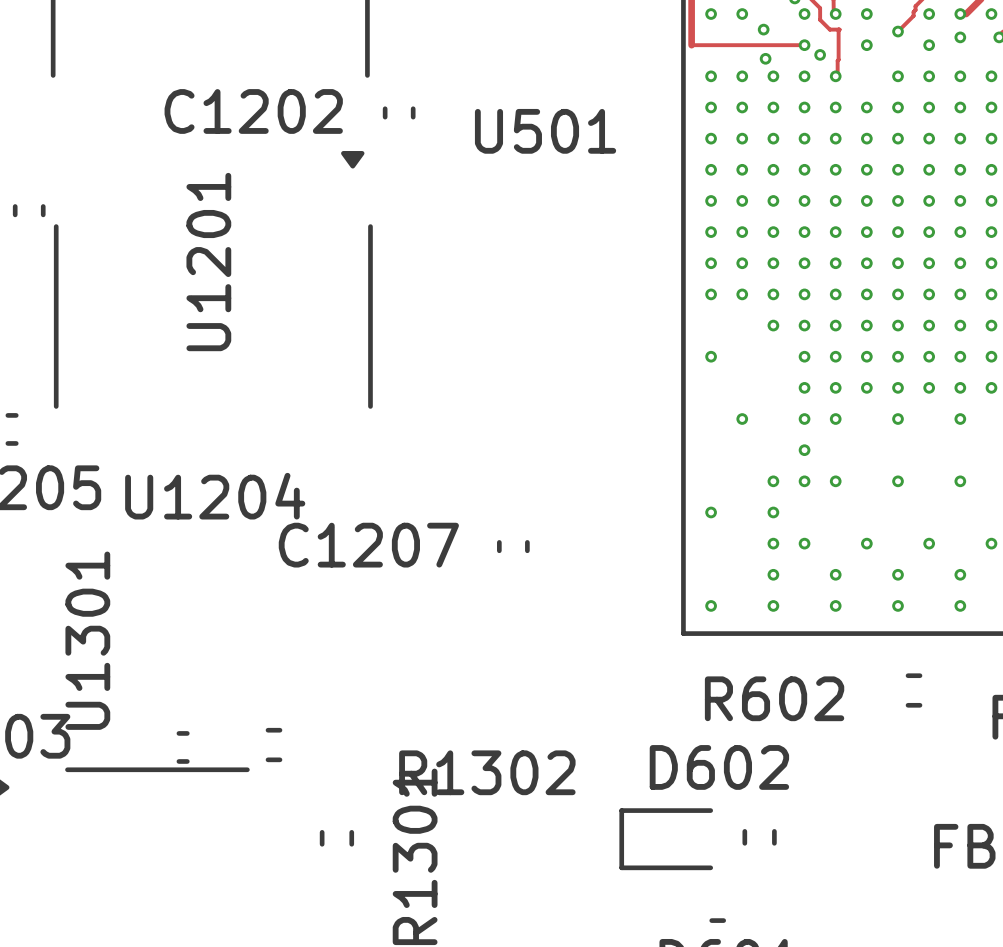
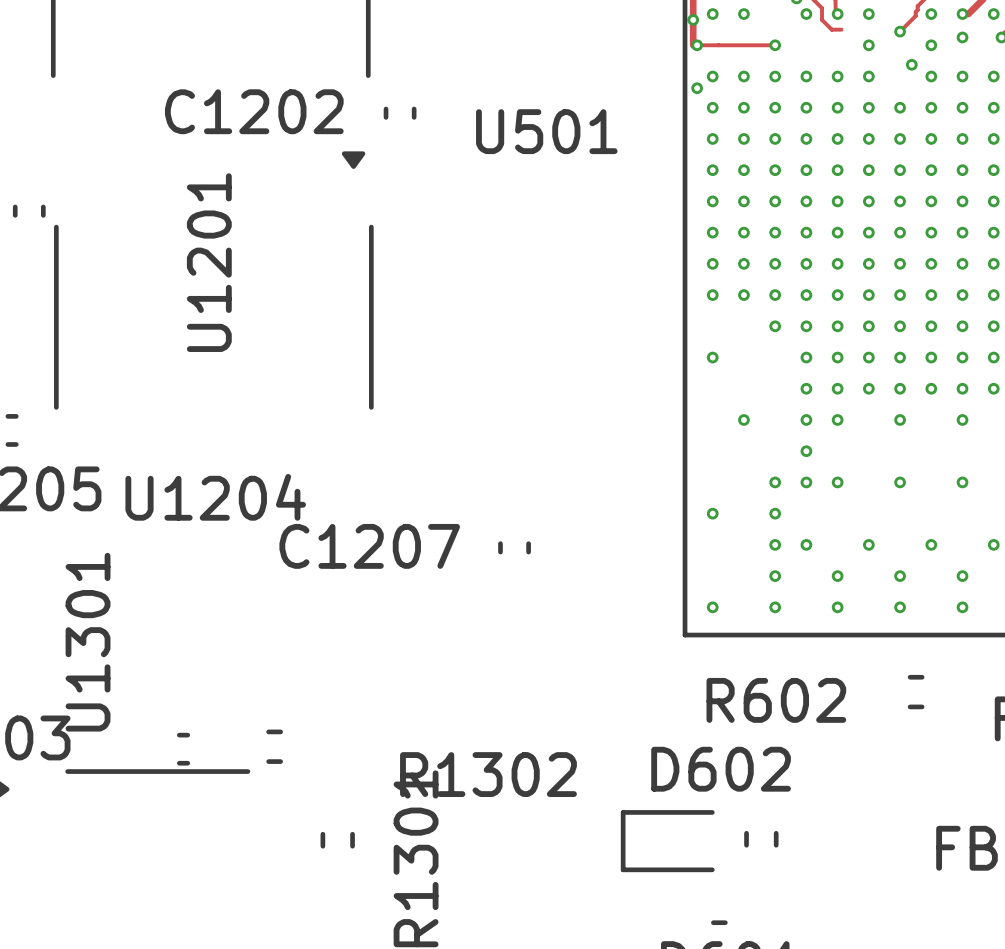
via: none -> (693, 19)
via: (763, 29) -> none
track: (838, 29) (837, 74) -> none
via: none -> (697, 45)
track: (773, 45) (804, 45) -> none
via: none -> (775, 45)
via: (804, 45) -> none
via: (820, 54) -> none
via: (765, 58) -> none
via: none -> (868, 76)
via position: (898, 76) -> (911, 64)
via: none -> (697, 88)

